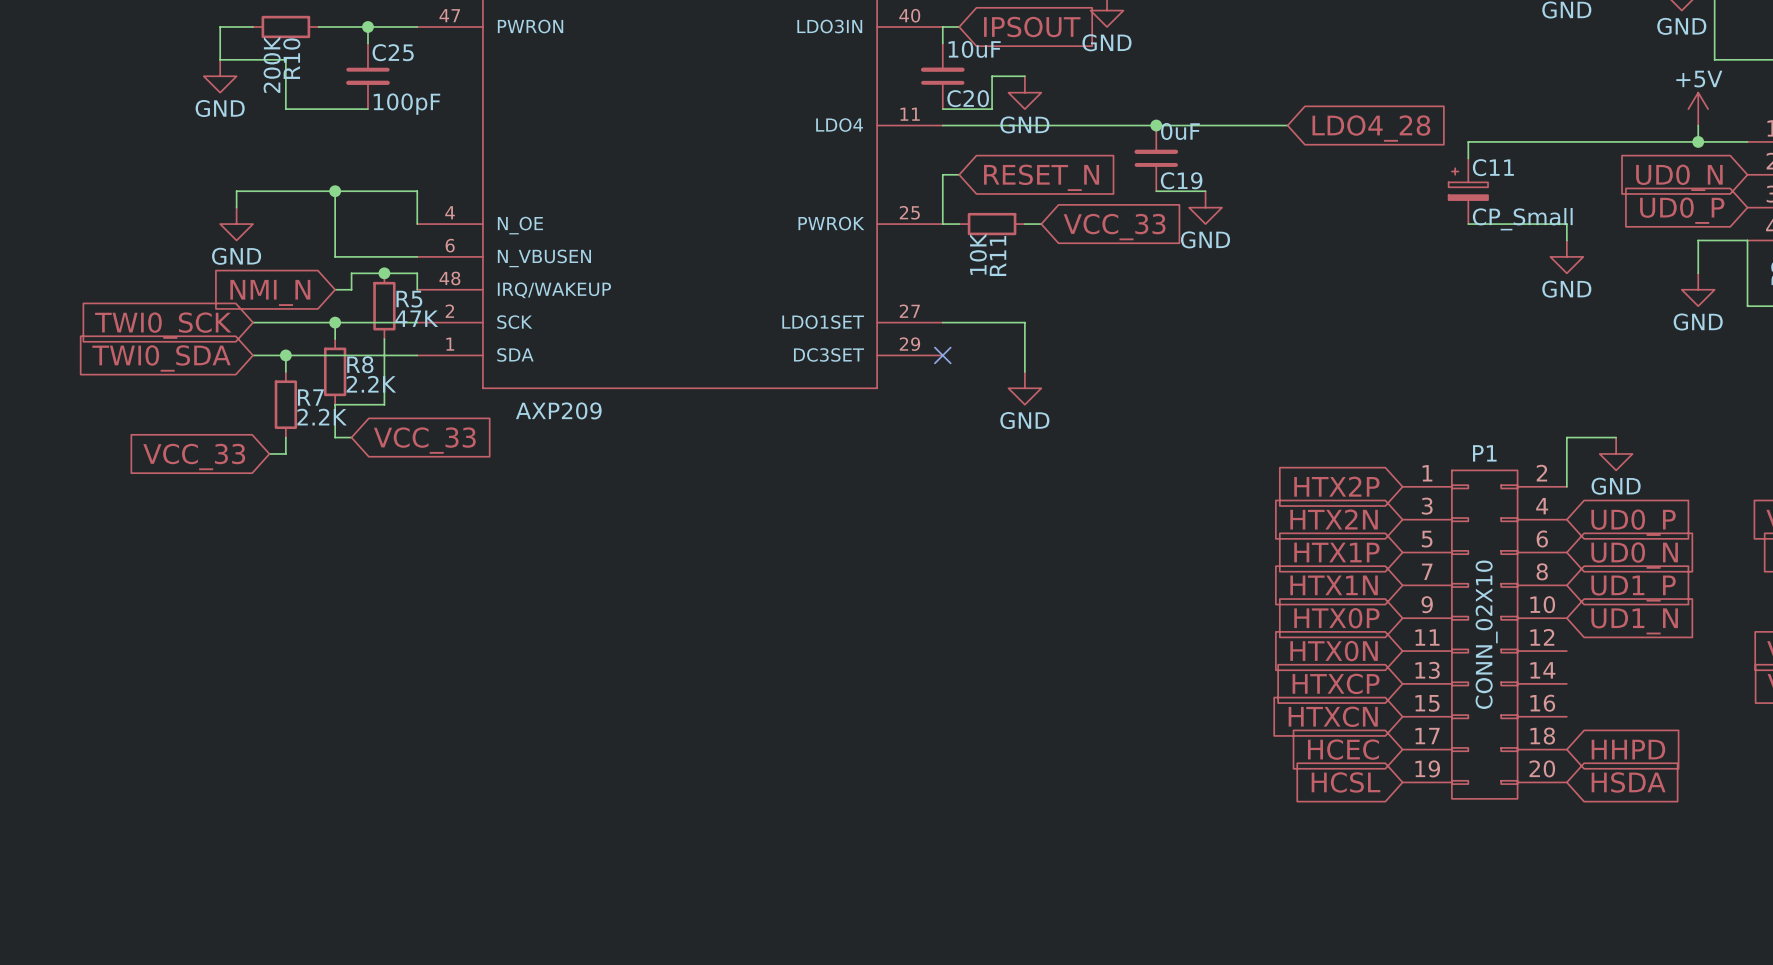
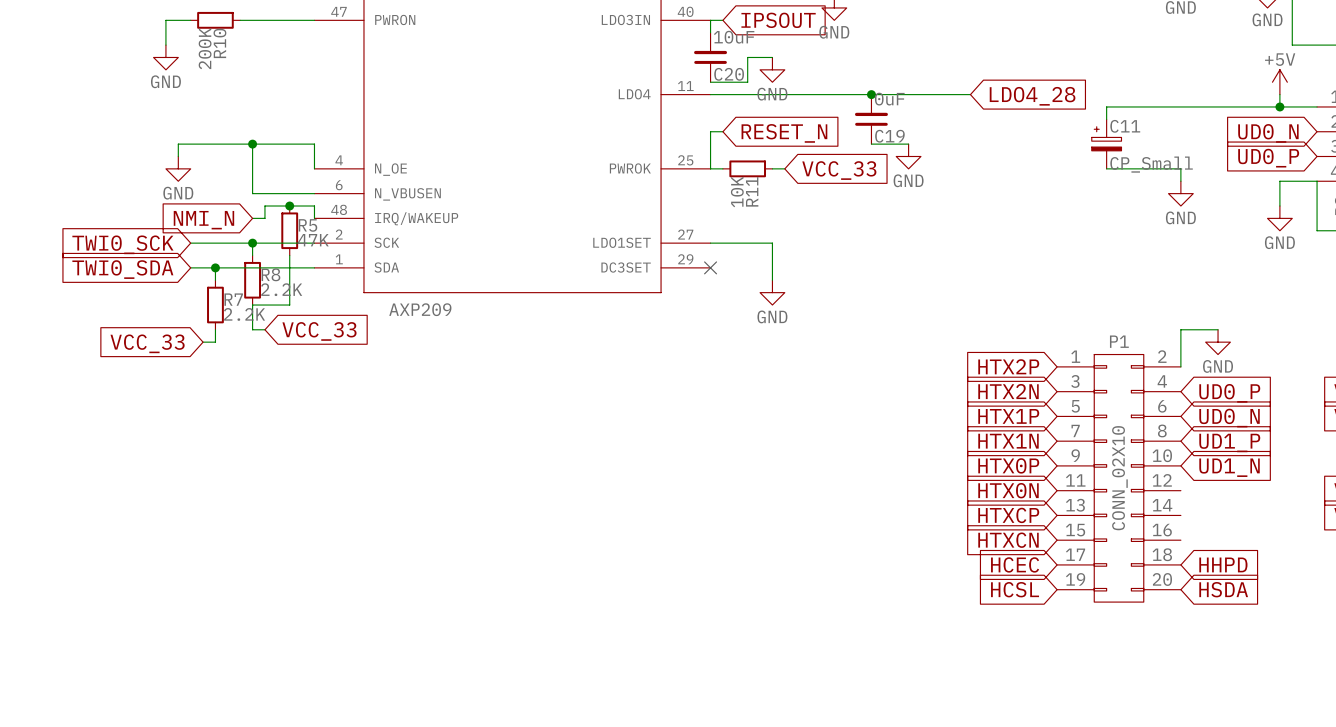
wire: (367, 26) (367, 43) -> none
junction: (367, 26) -> none
wire: (220, 59) (285, 59) (285, 109) (367, 109) -> none
C25: 100pF (367, 76) -> none

